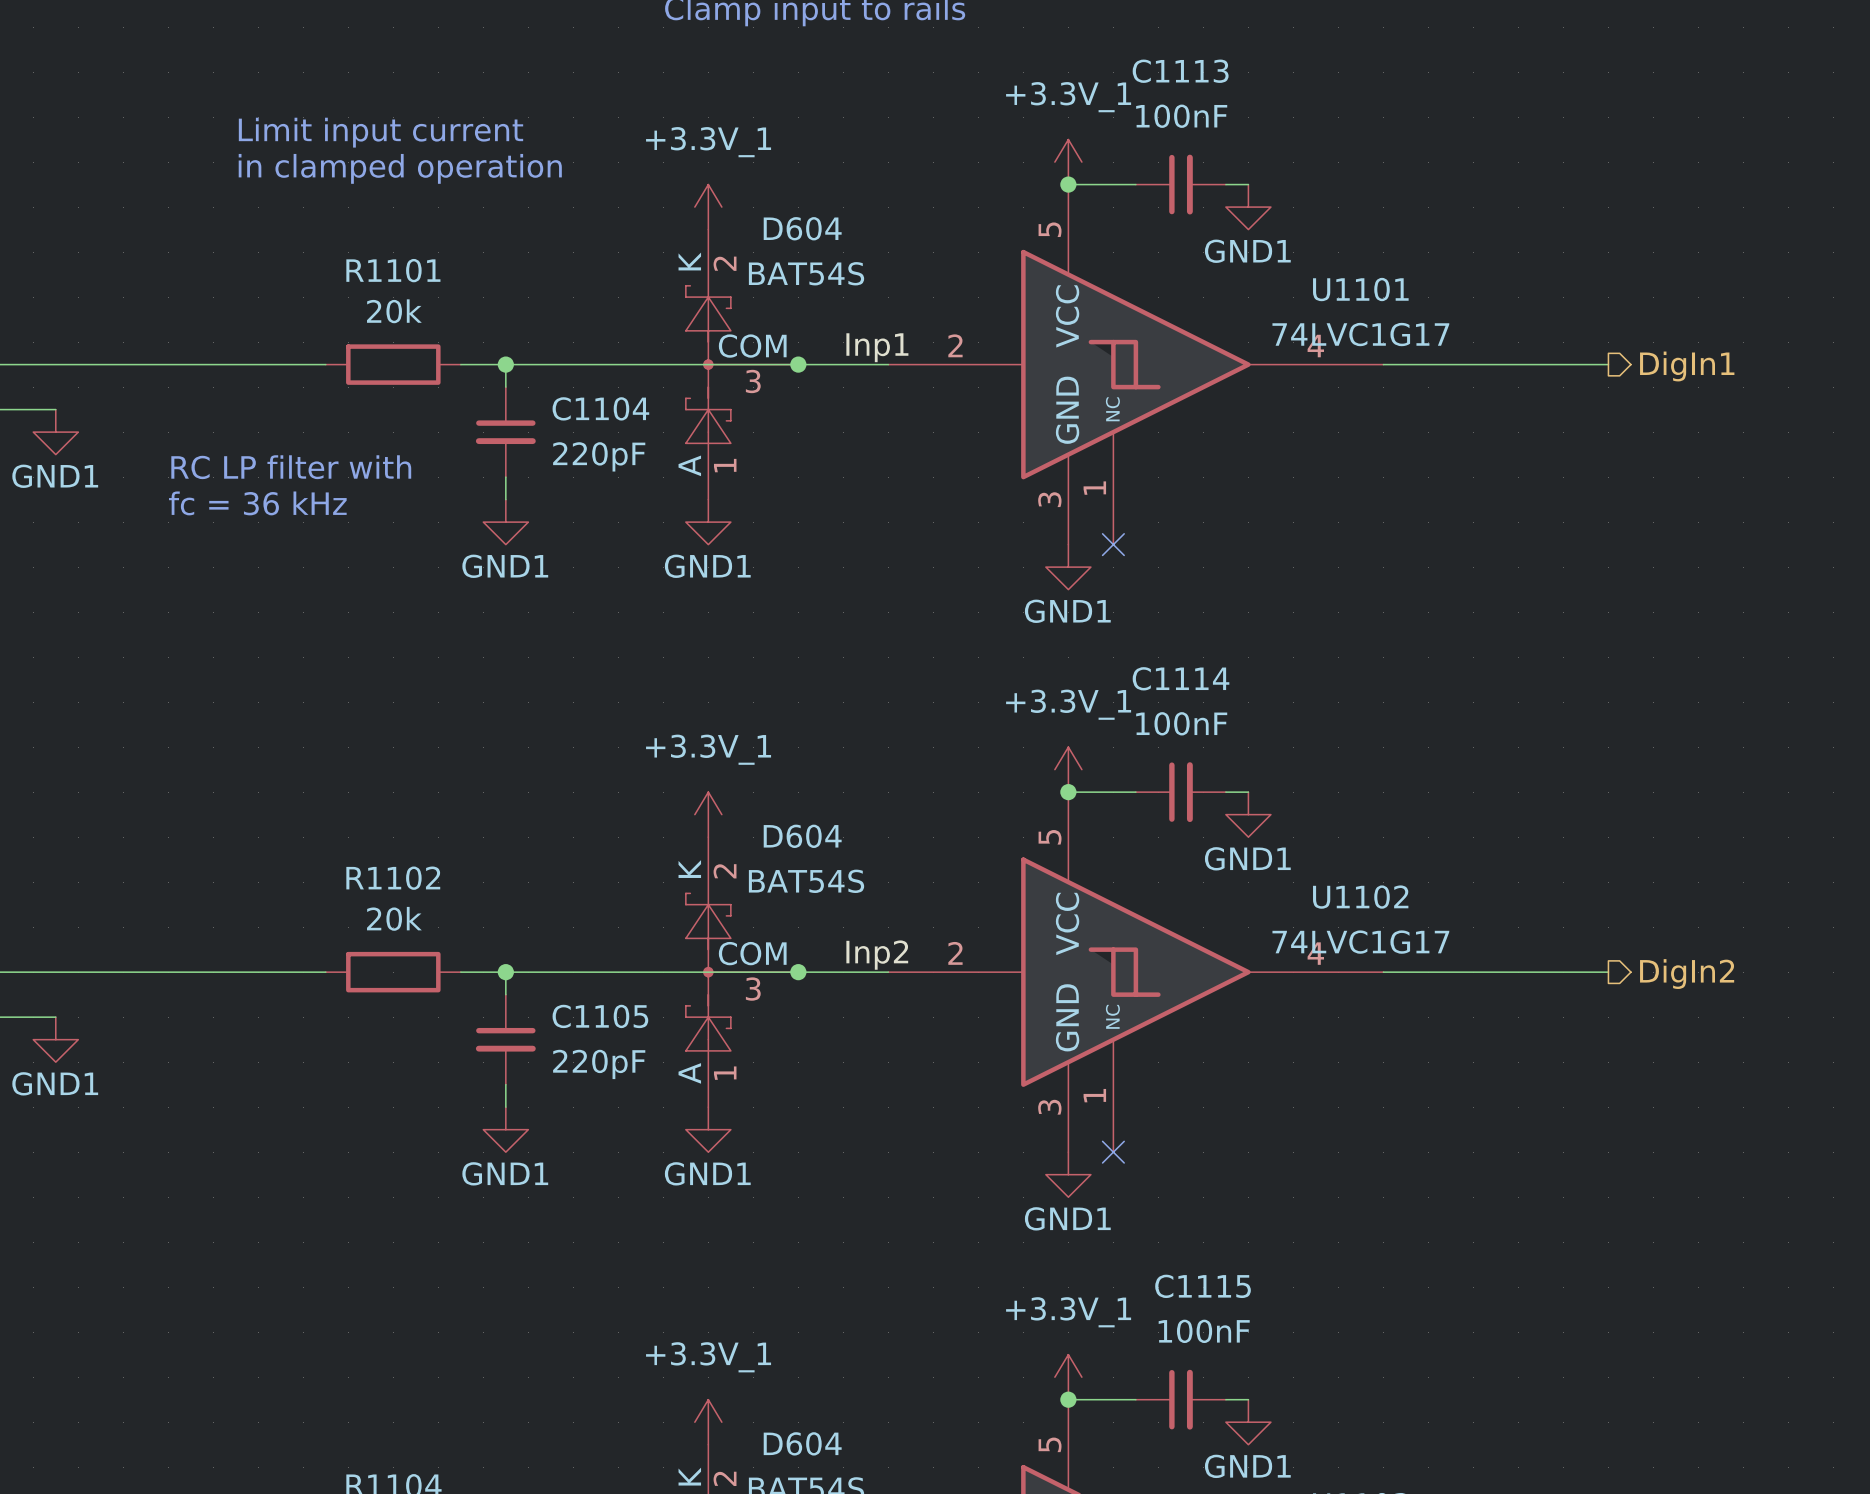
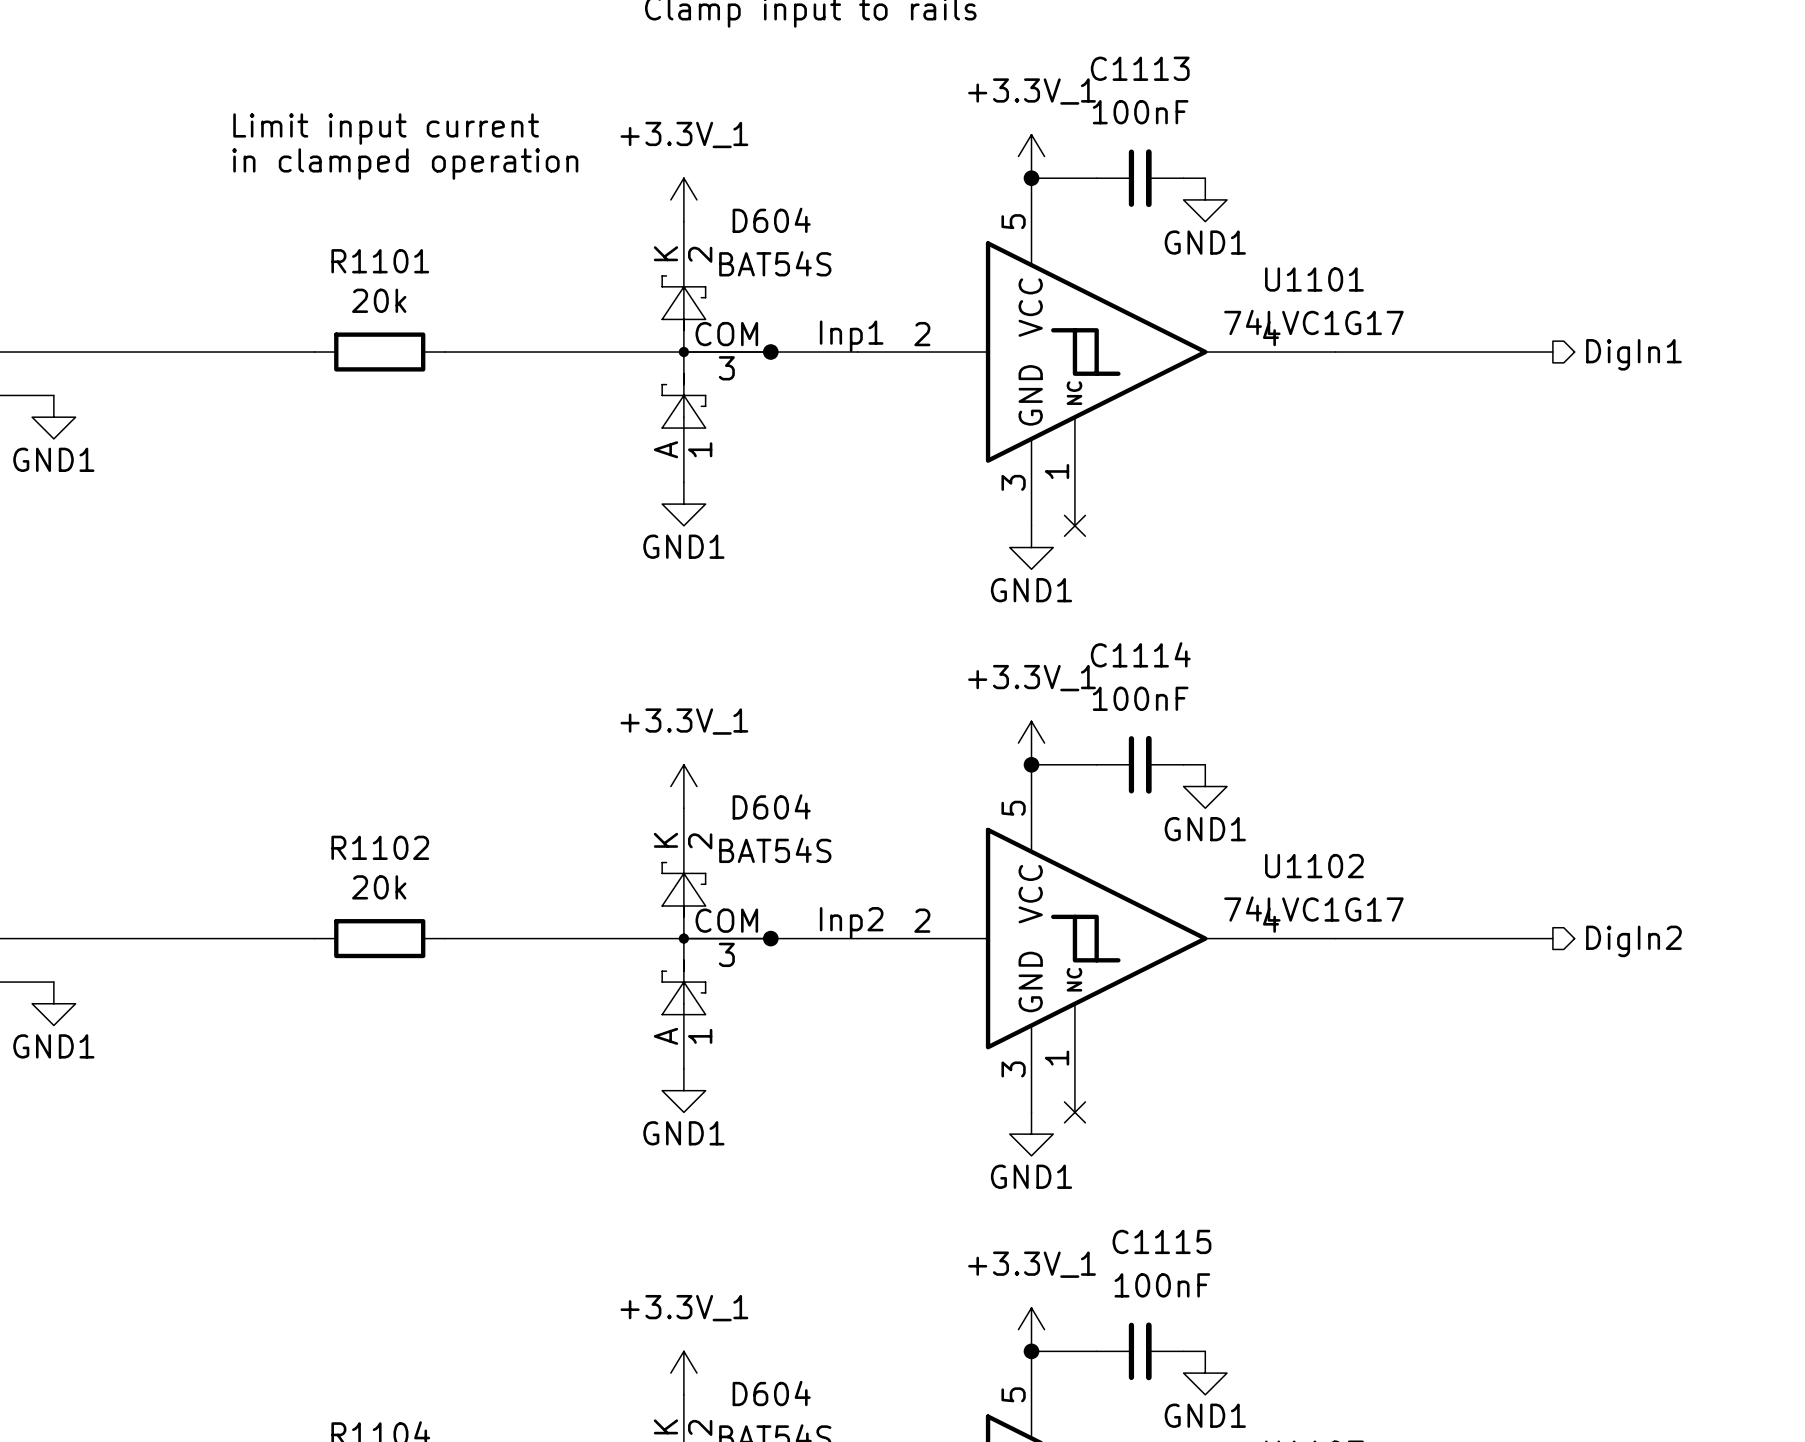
wire: (505, 364) (505, 387) -> none
junction: (505, 364) -> none
C1104: 220pF (505, 432) -> none
text: RC LP filter with (291, 467) -> none
wire: (505, 477) (505, 499) -> none
text: fc = 36 kHz (257, 503) -> none
power symbol: GND1 (505, 522) -> none
wire: (505, 972) (505, 994) -> none
junction: (505, 972) -> none
C1105: 220pF (505, 1039) -> none
wire: (505, 1084) (505, 1107) -> none
power symbol: GND1 (505, 1129) -> none

